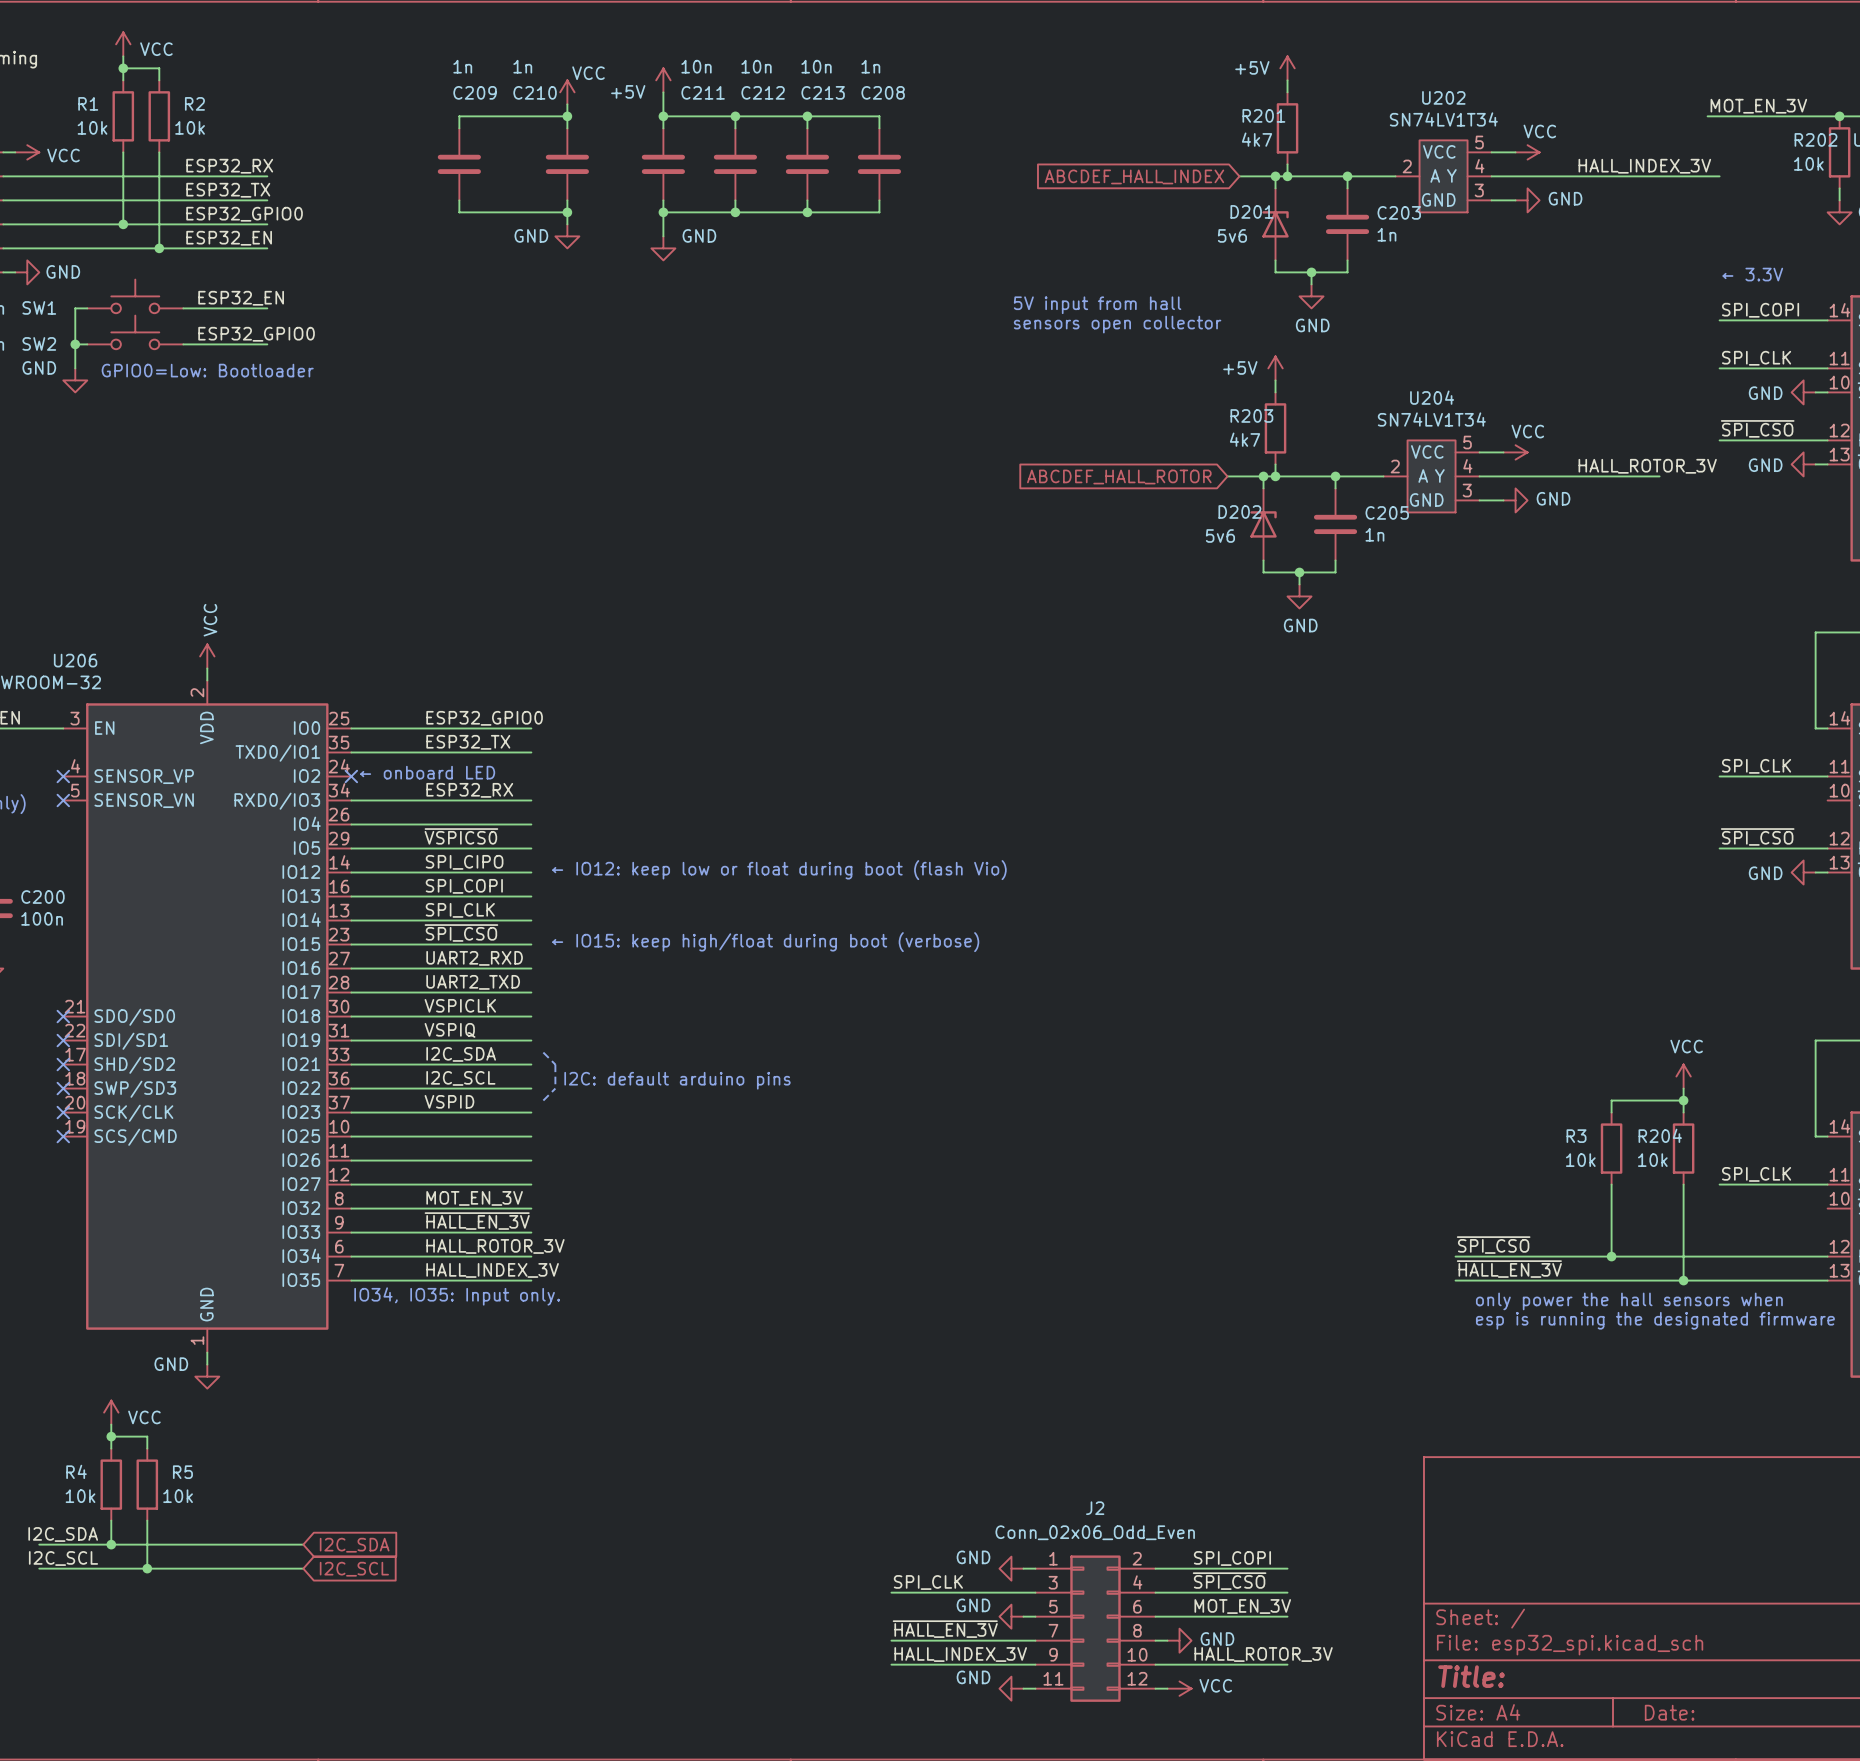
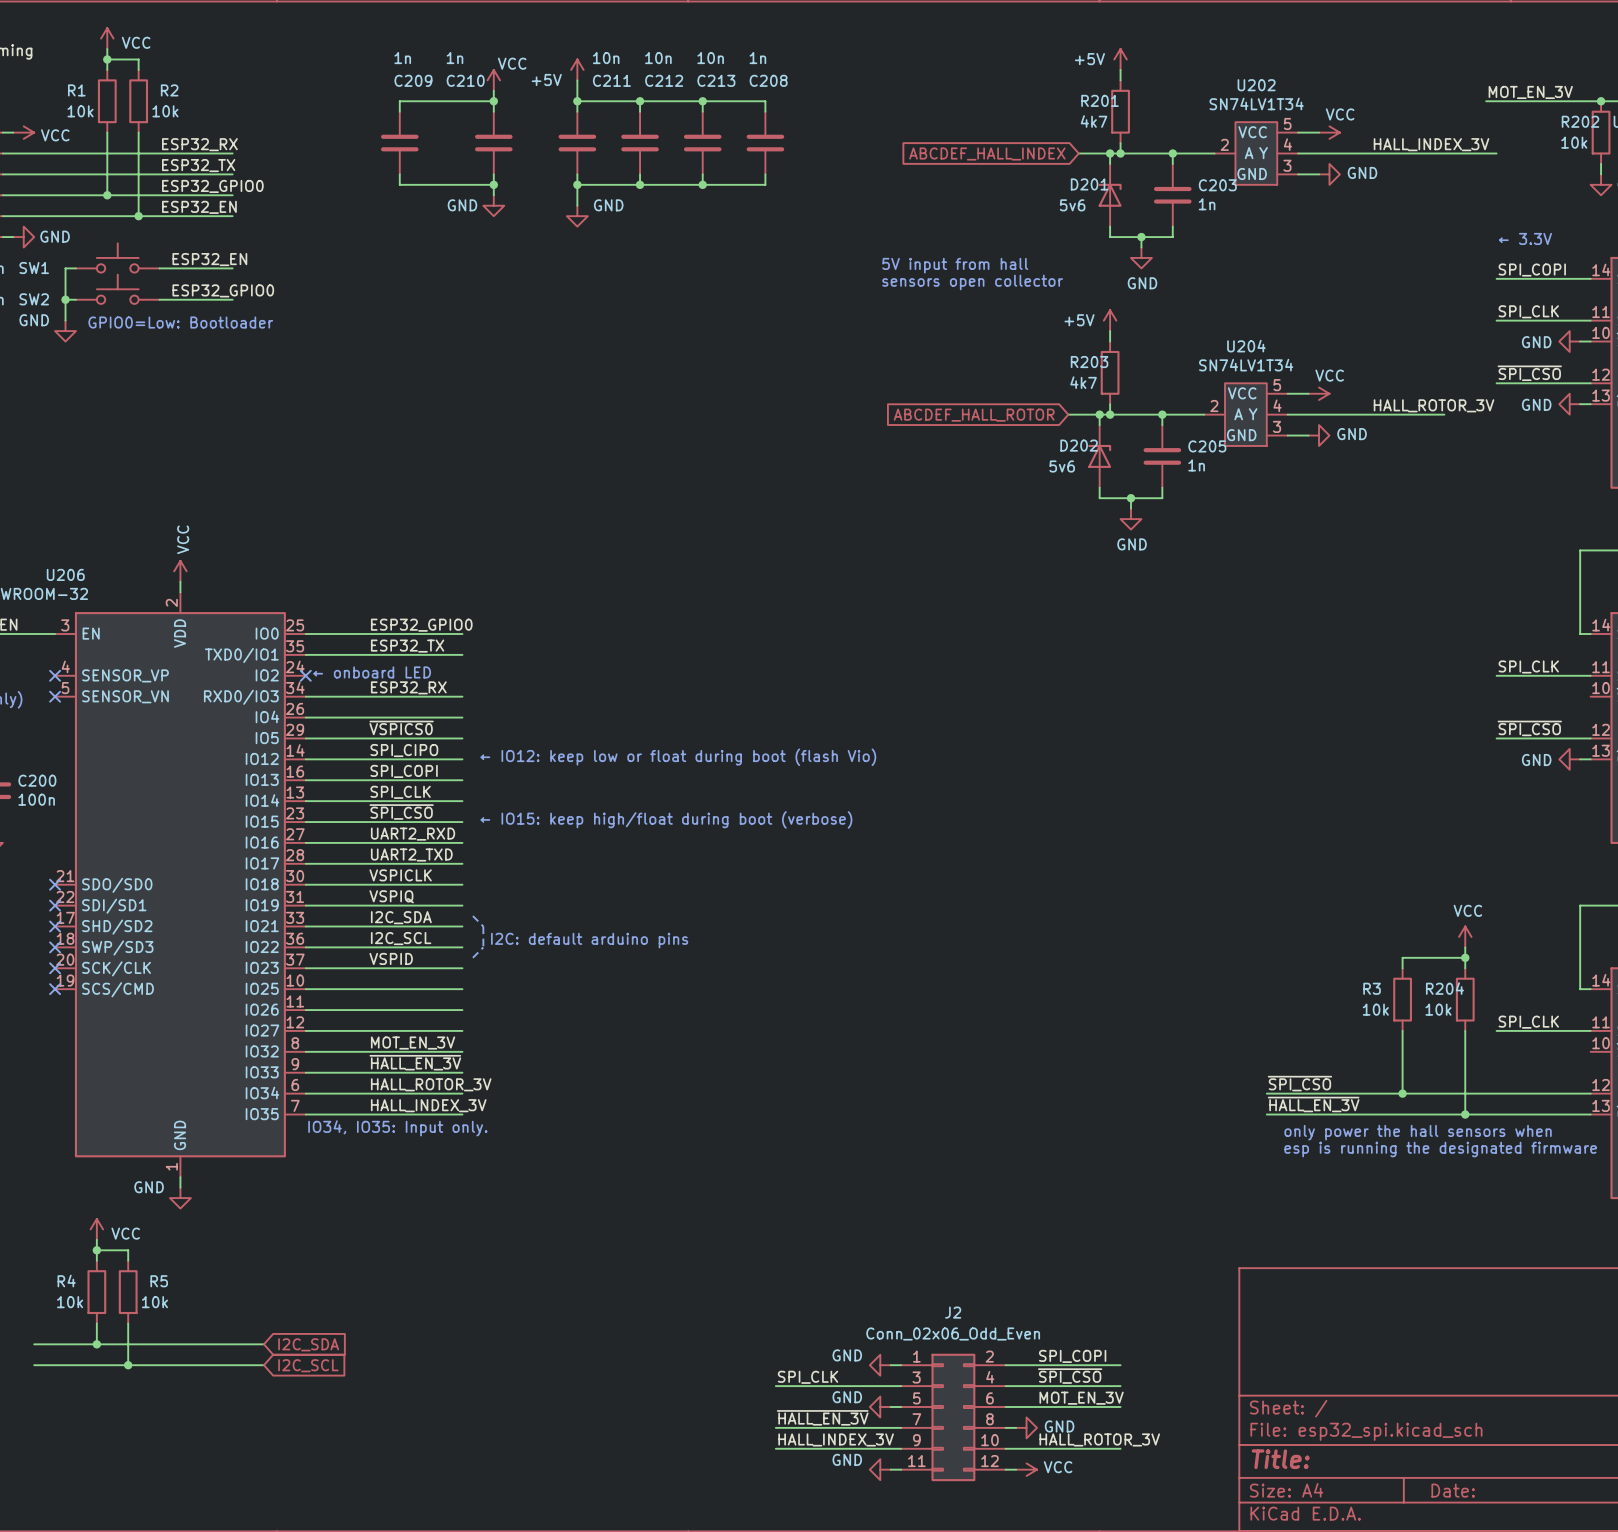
label: I2C_SDA (63, 1534) -> none
label: I2C_SCL (63, 1558) -> none

